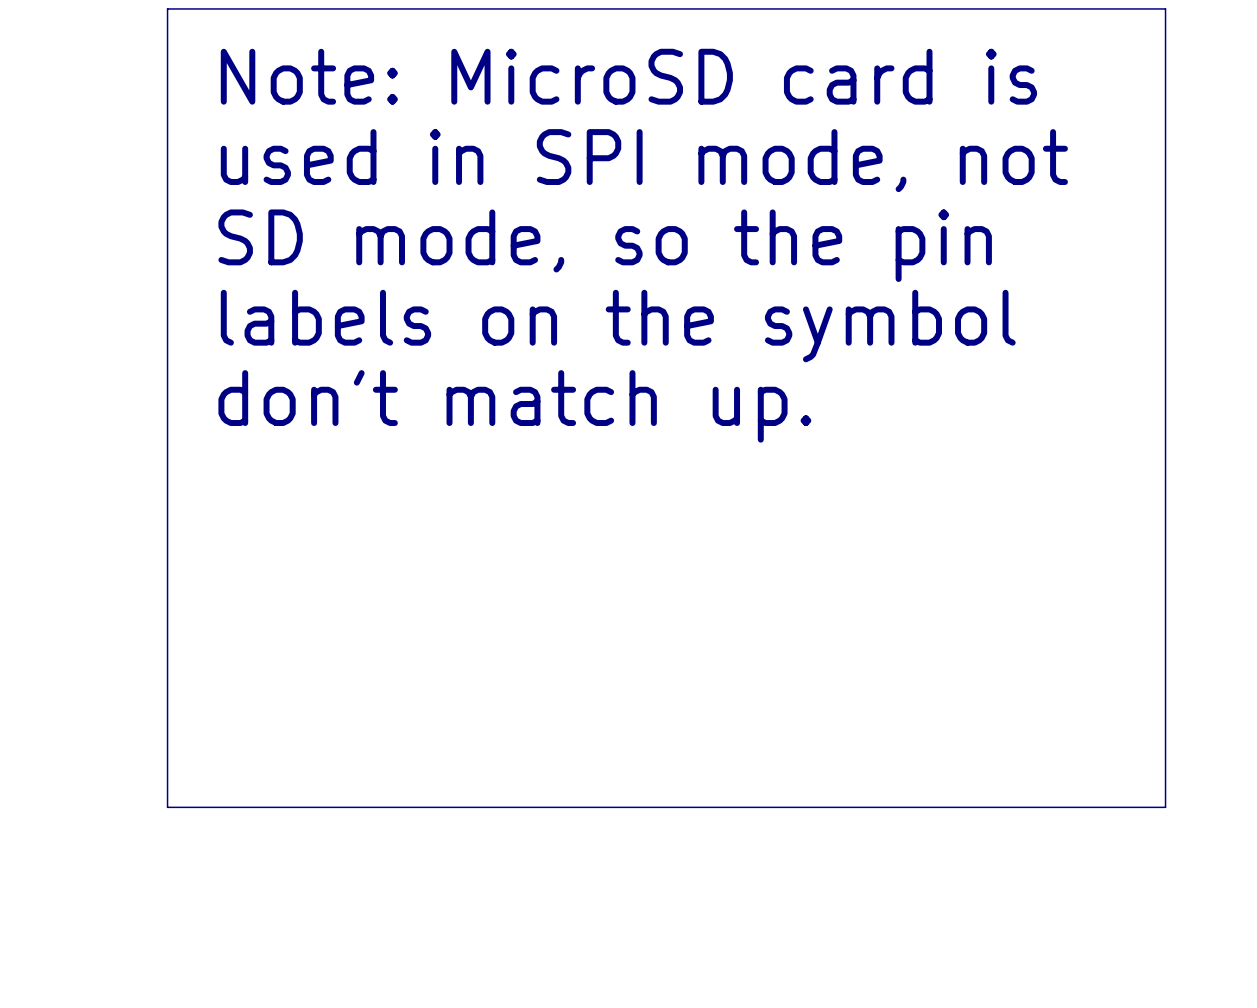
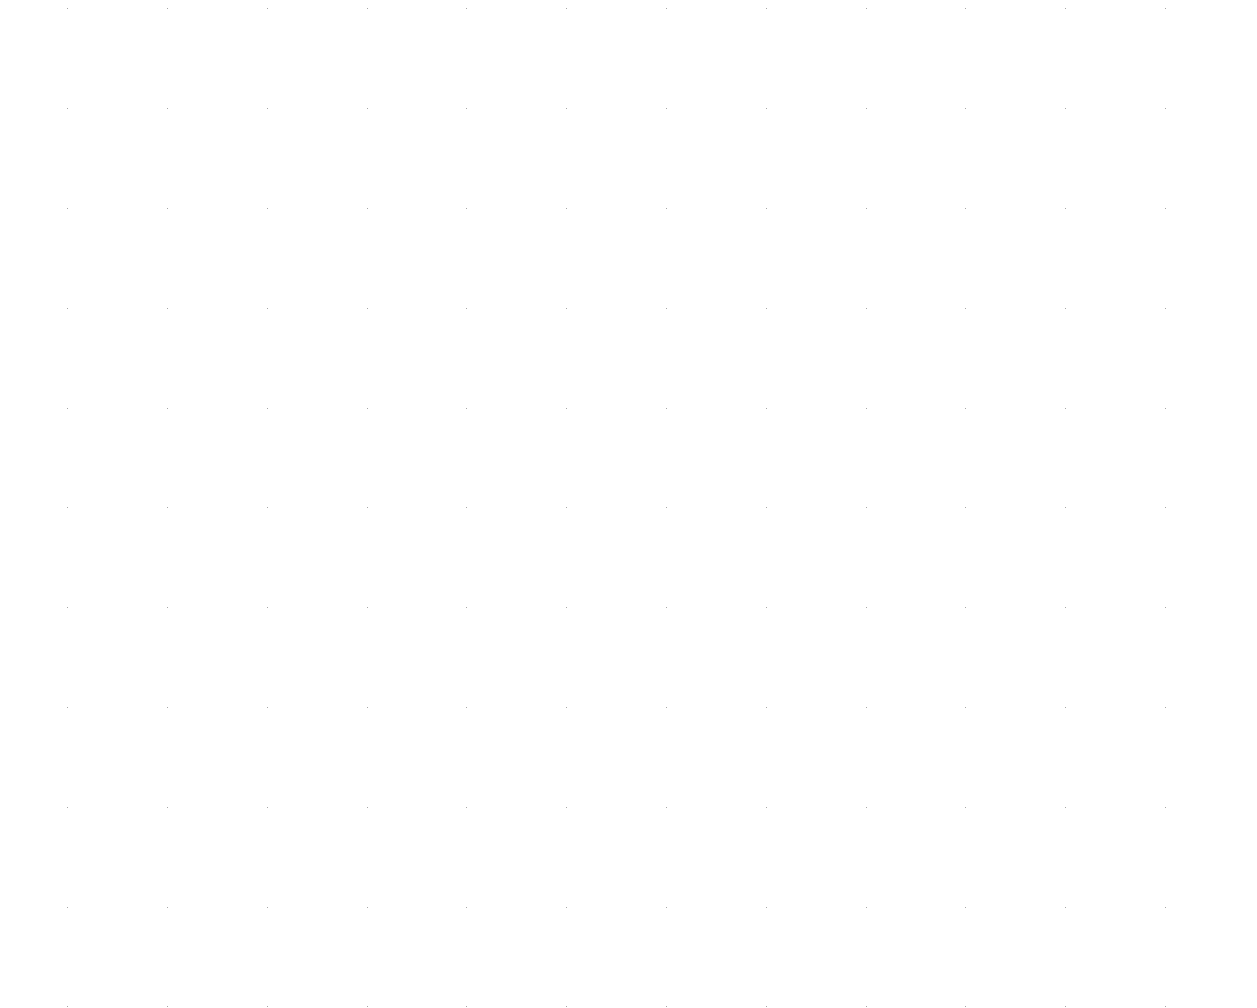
line: (167, 8) (1165, 8) (1165, 807) (167, 807) (167, 8) -> none
text: Note: MicroSD card is (628, 76) -> none
text: used in SPI mode, not (644, 160) -> none
text: SD mode, so the pin (605, 245) -> none
text: labels on the symbol (618, 326) -> none
text: don't match up. (514, 406) -> none

